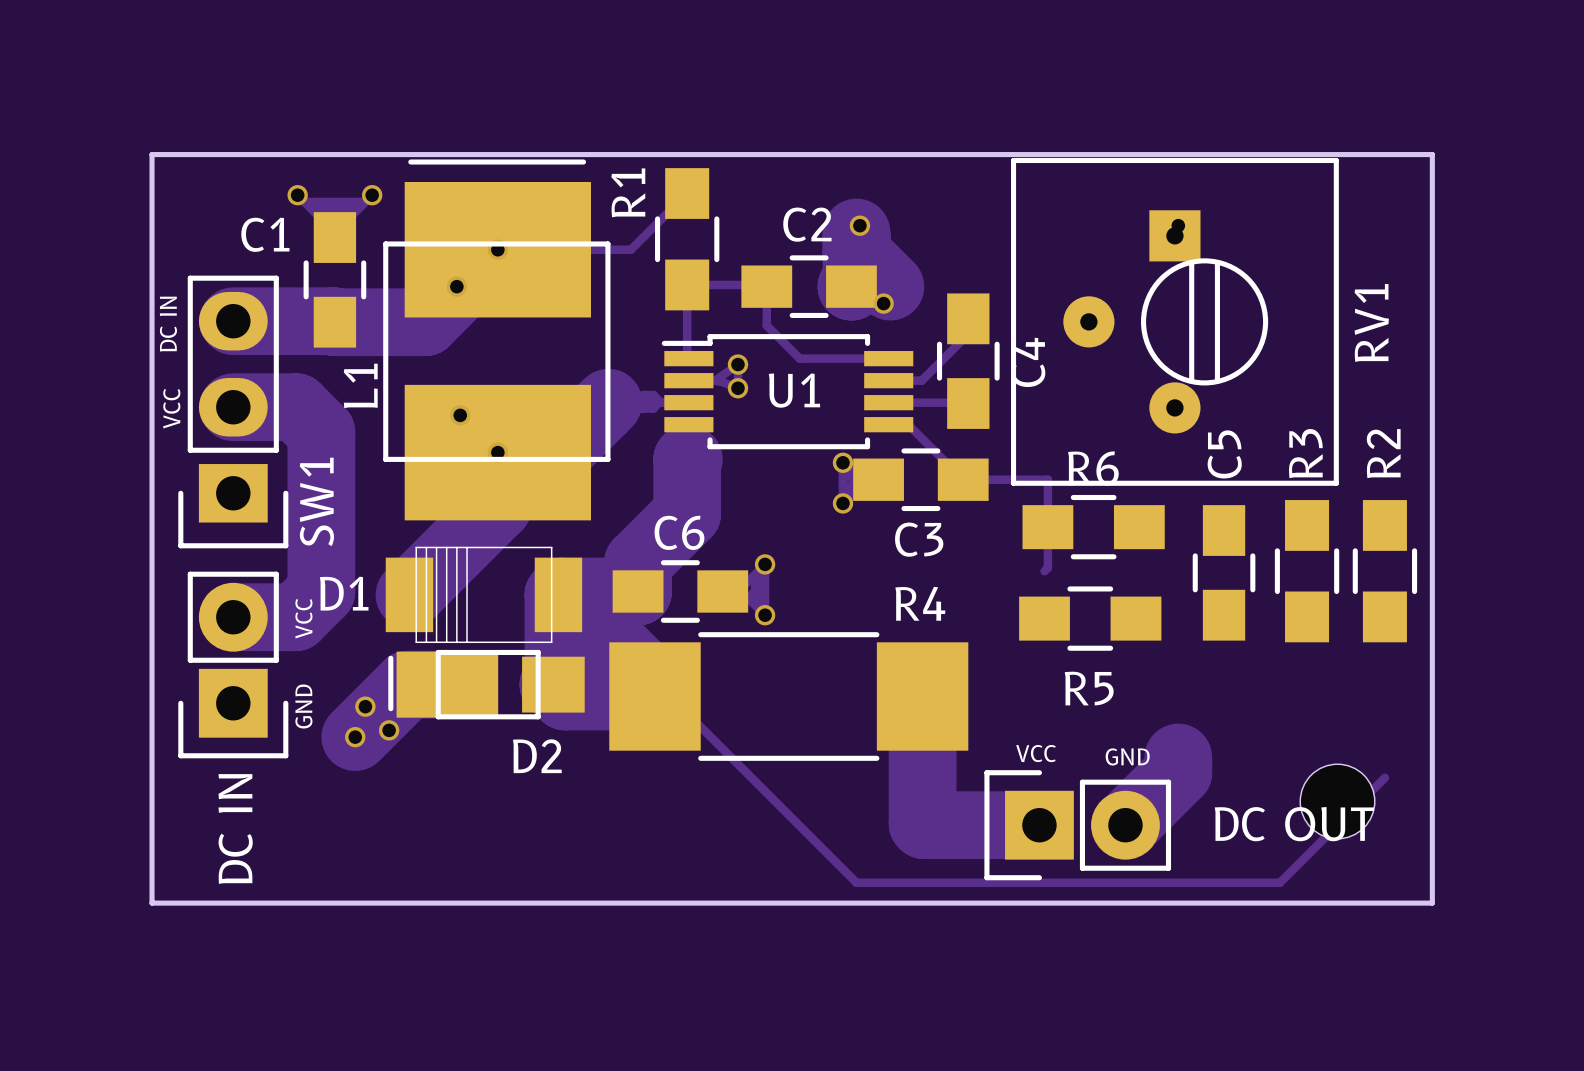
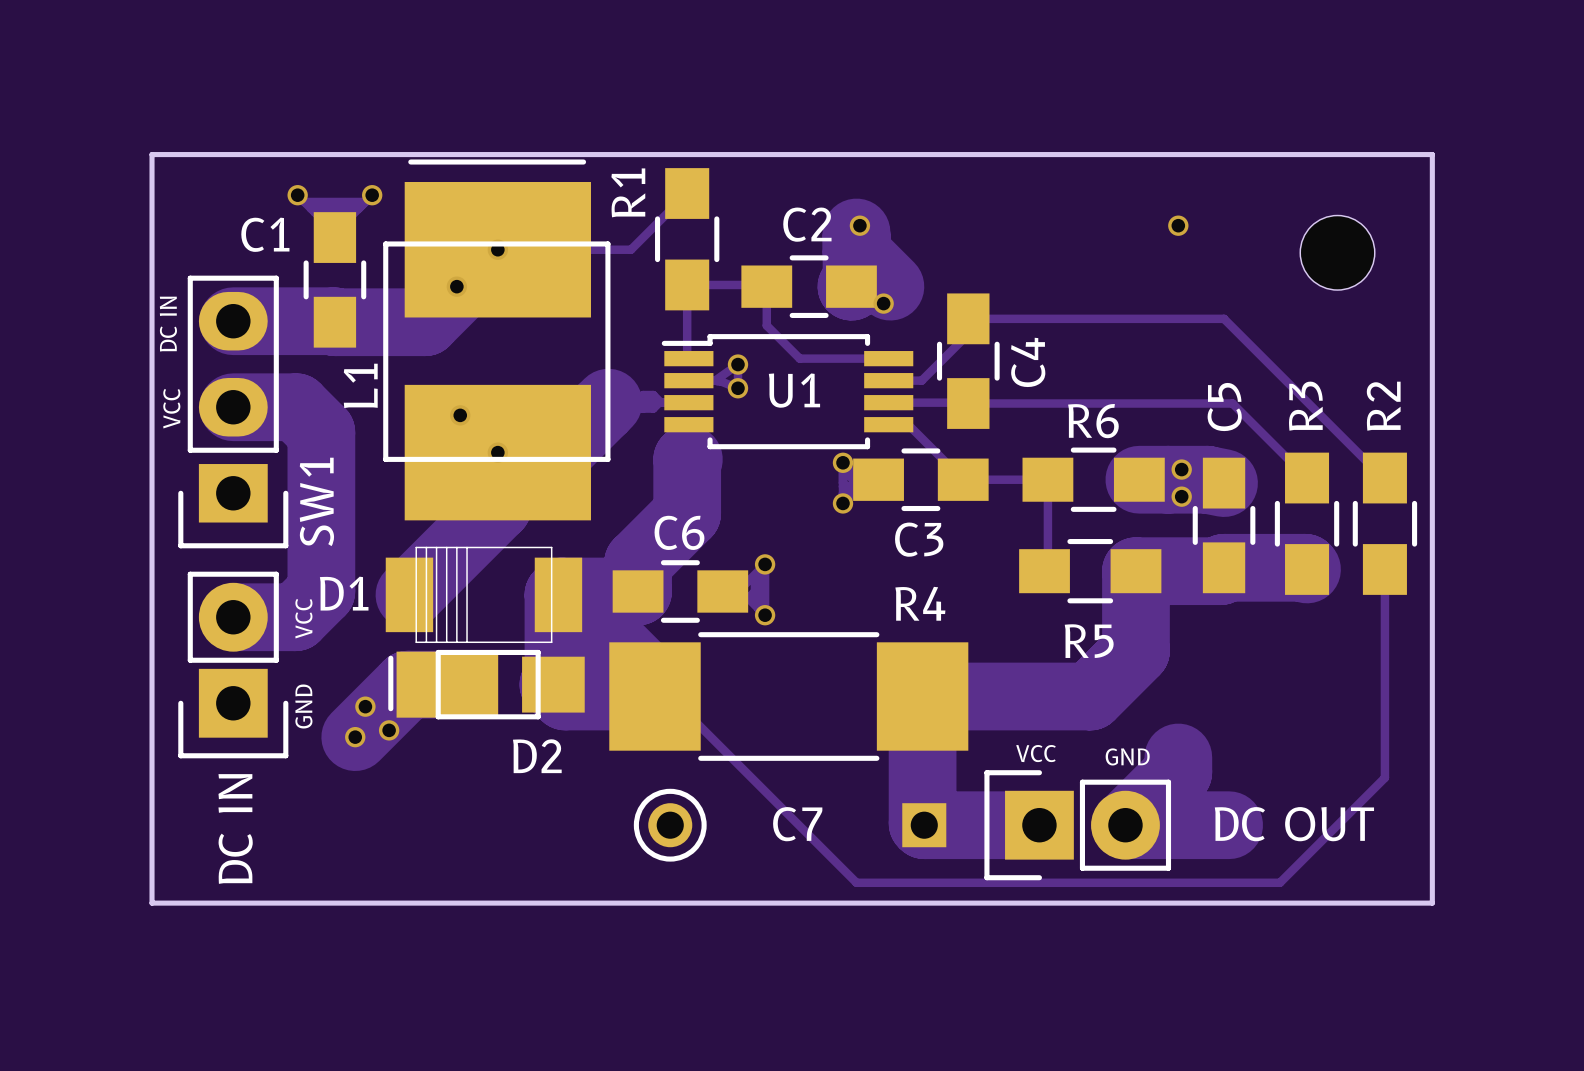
track: none -> (968, 318) (1224, 318) (1384, 478)
RV1: (1174, 321) -> none
track: none -> (968, 403) (1232, 403) (1307, 478)
via: none -> (1181, 469)
track: none -> (1139, 479) (1207, 479) (1224, 483)
via: none -> (1181, 496)
R6 position: (1093, 527) -> (1093, 479)
track: none -> (1307, 569) (1305, 567) (1224, 567) (1220, 571) (1135, 571) (1135, 650) (1090, 696) (922, 696)
track: none -> (1384, 569) (1384, 777)
R3 position: (1307, 571) -> (1307, 523)
R2 position: (1384, 571) -> (1384, 523)
C5 position: (1224, 572) -> (1224, 525)
R5 position: (1090, 618) -> (1090, 571)
part position: (1337, 801) -> (1337, 252)
C7: none -> (790, 825)
track: none -> (1125, 825) (1229, 825)

